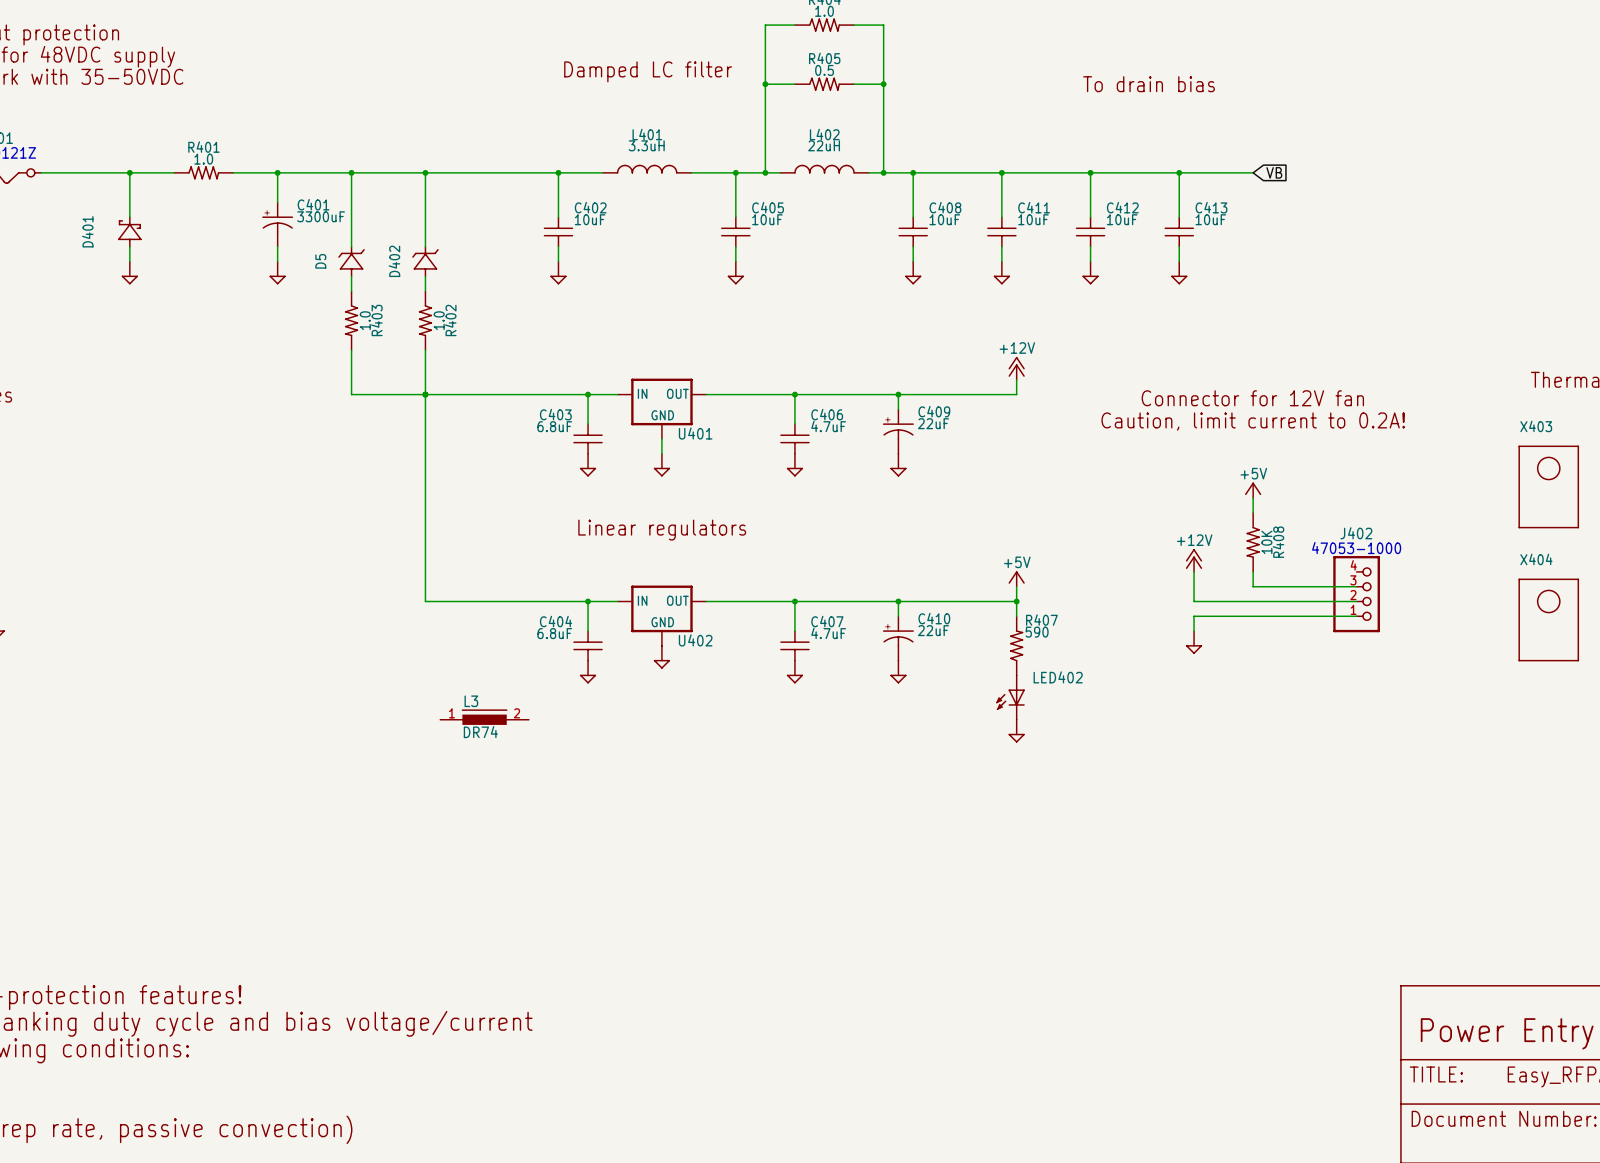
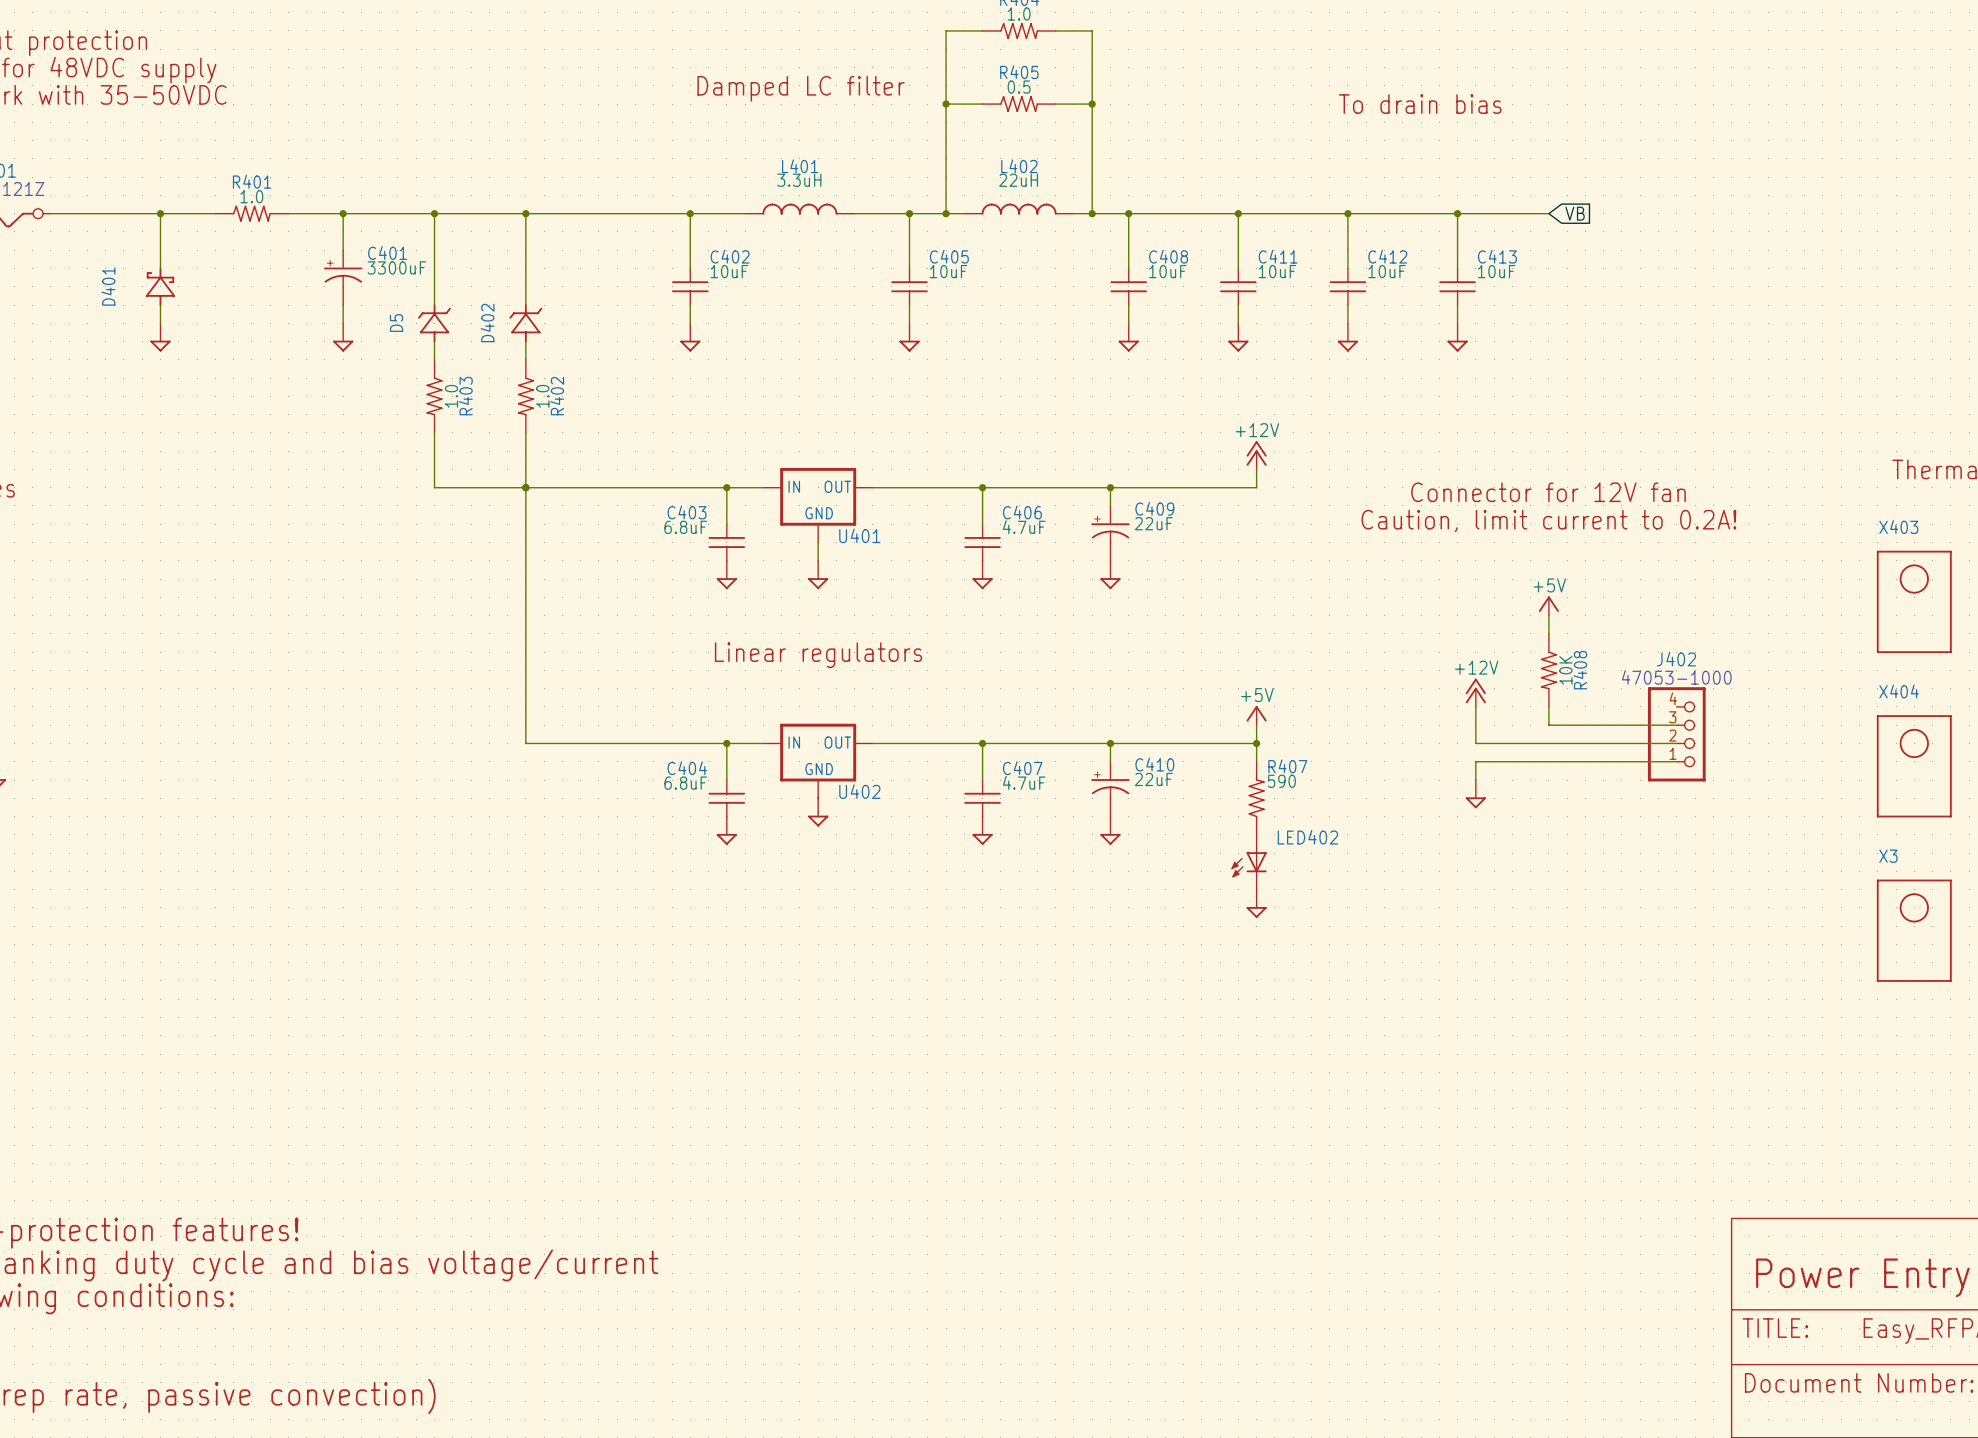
L3: DR74 (484, 717) -> none
X3: none -> (1914, 930)

